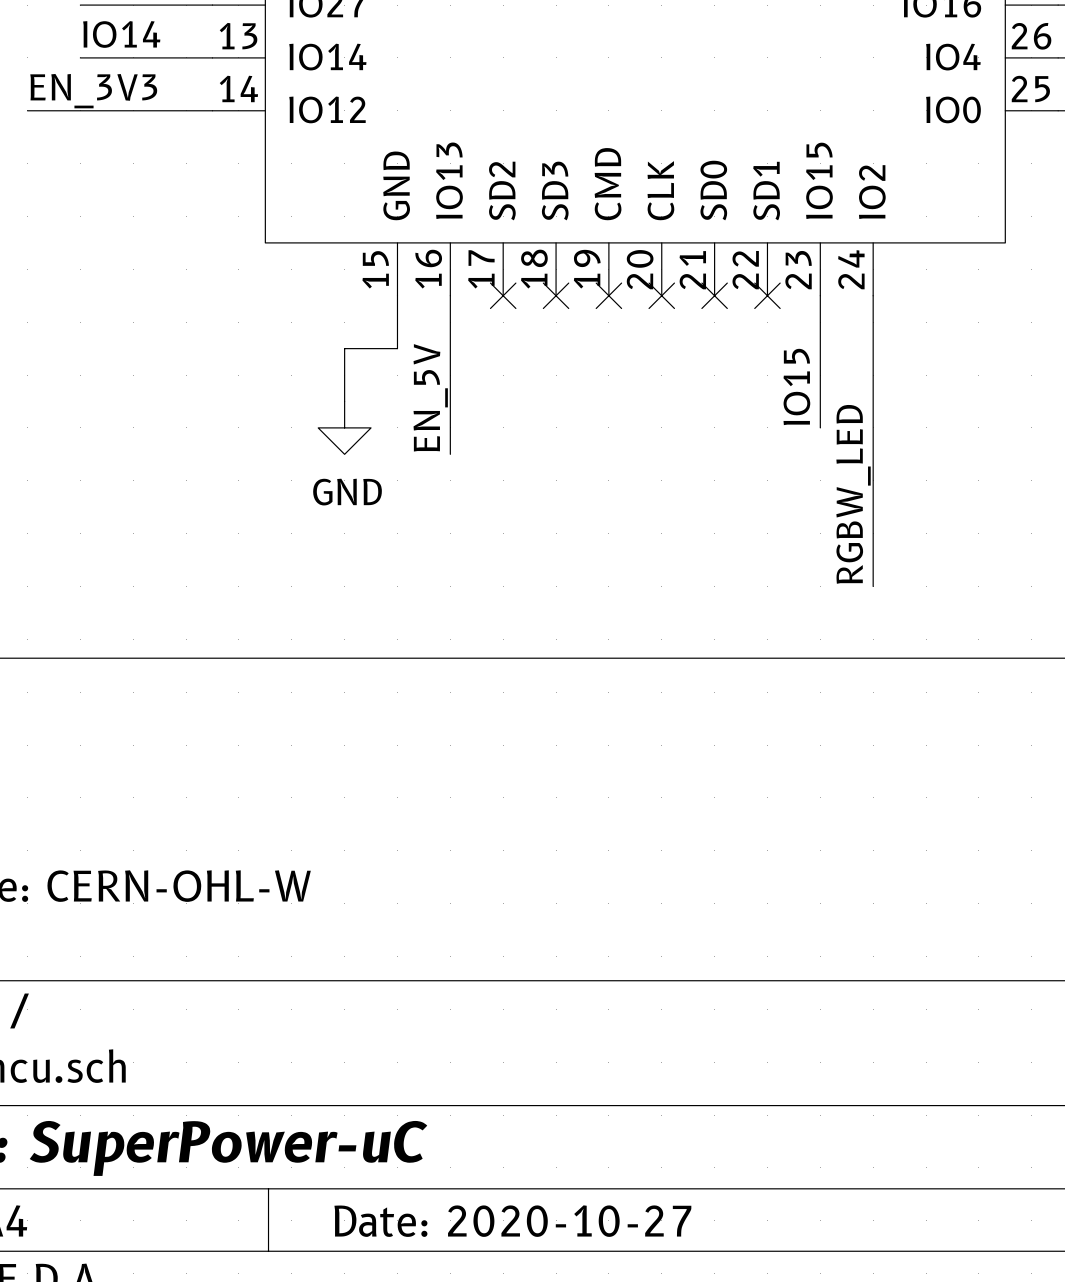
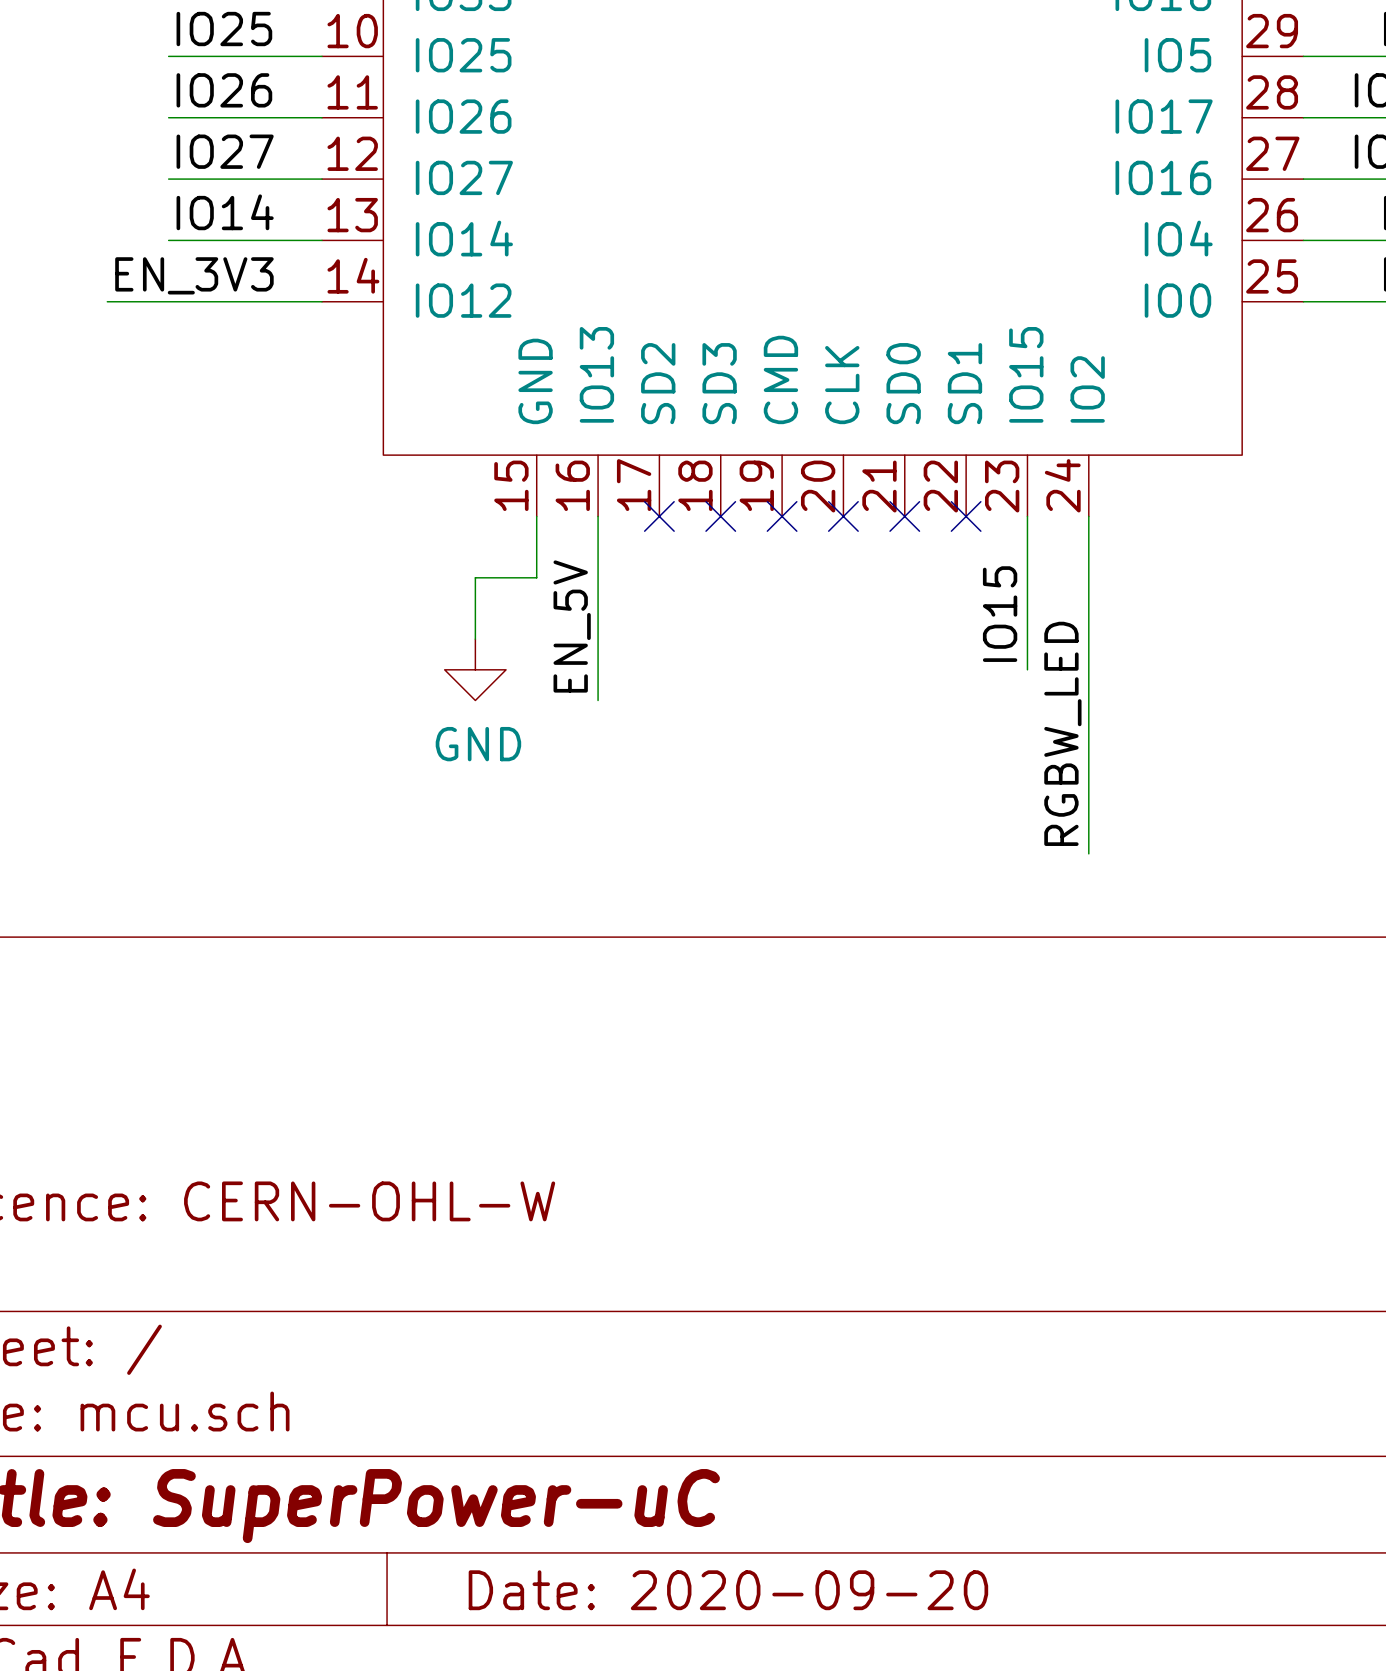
title block: Date: 2020-10-27 (512, 1221) -> Date: 2020-09-20 (728, 1590)

